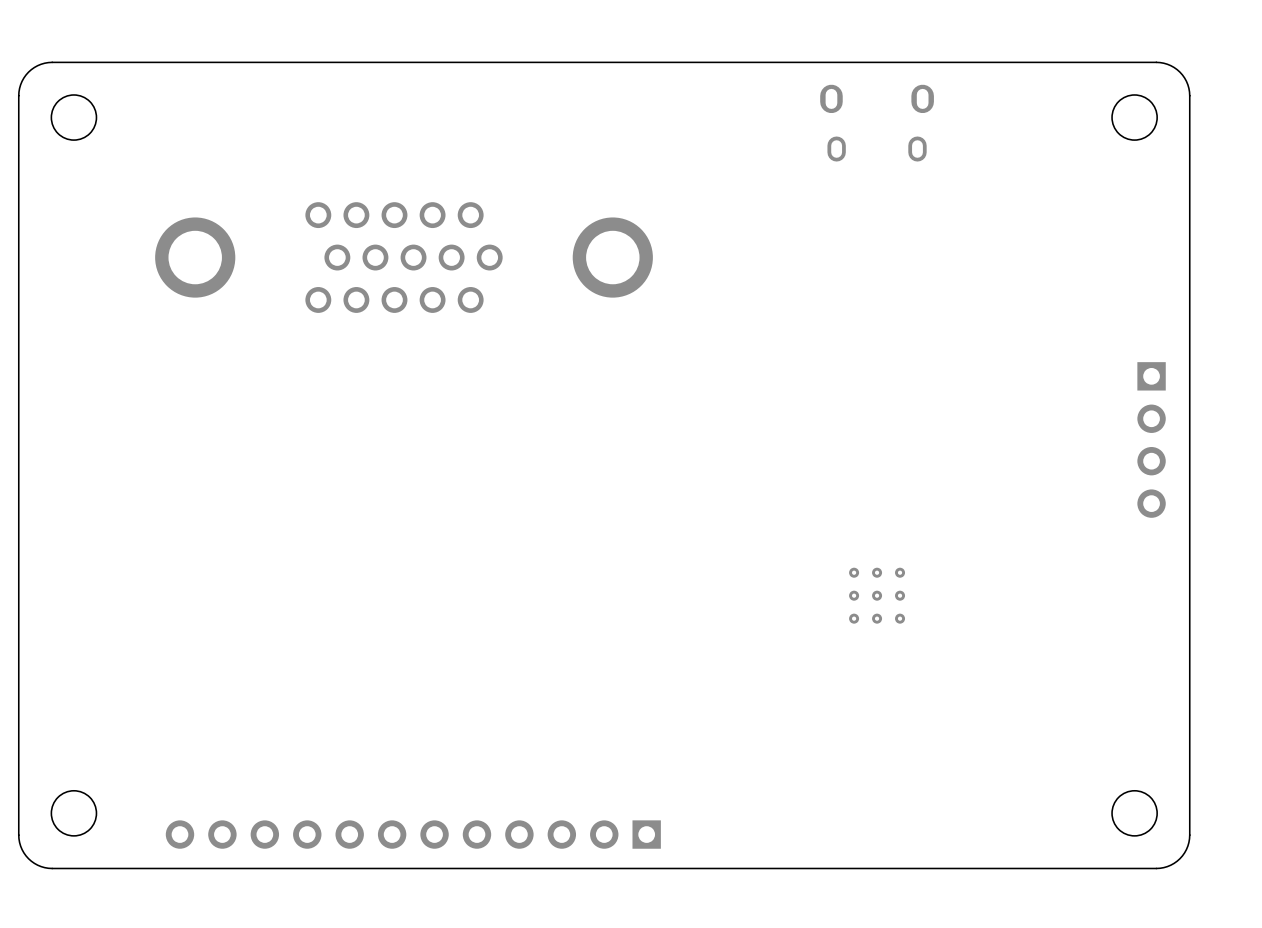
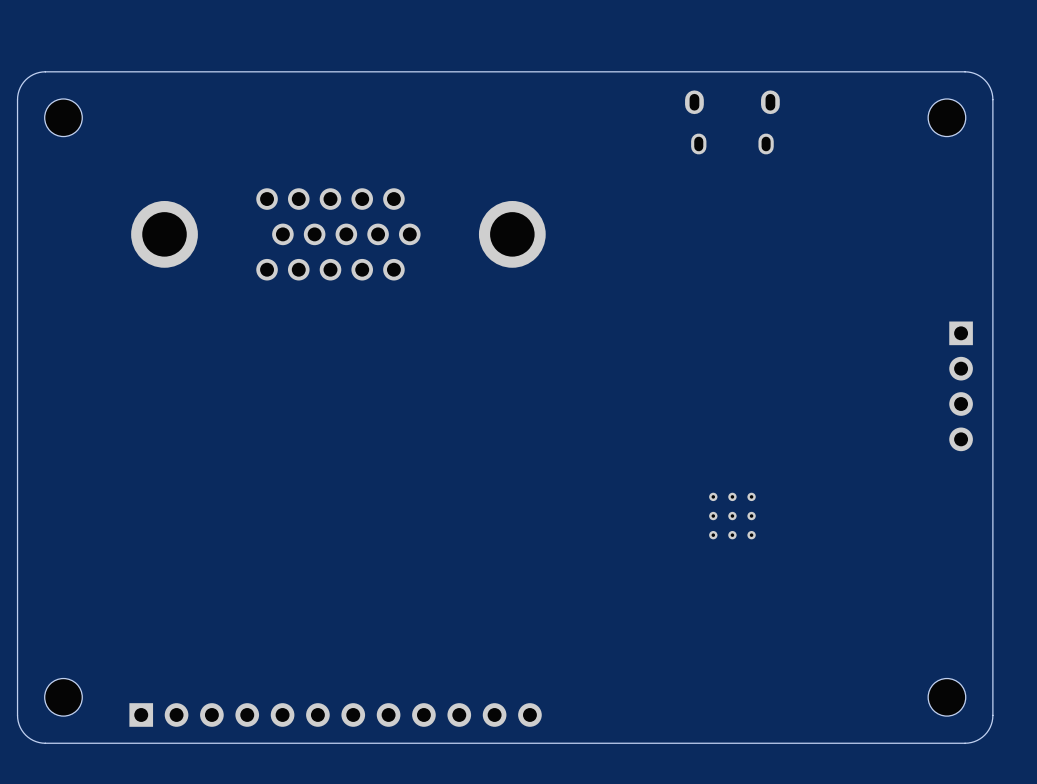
part rotation: 0° (413, 834) -> 180° (335, 714)

